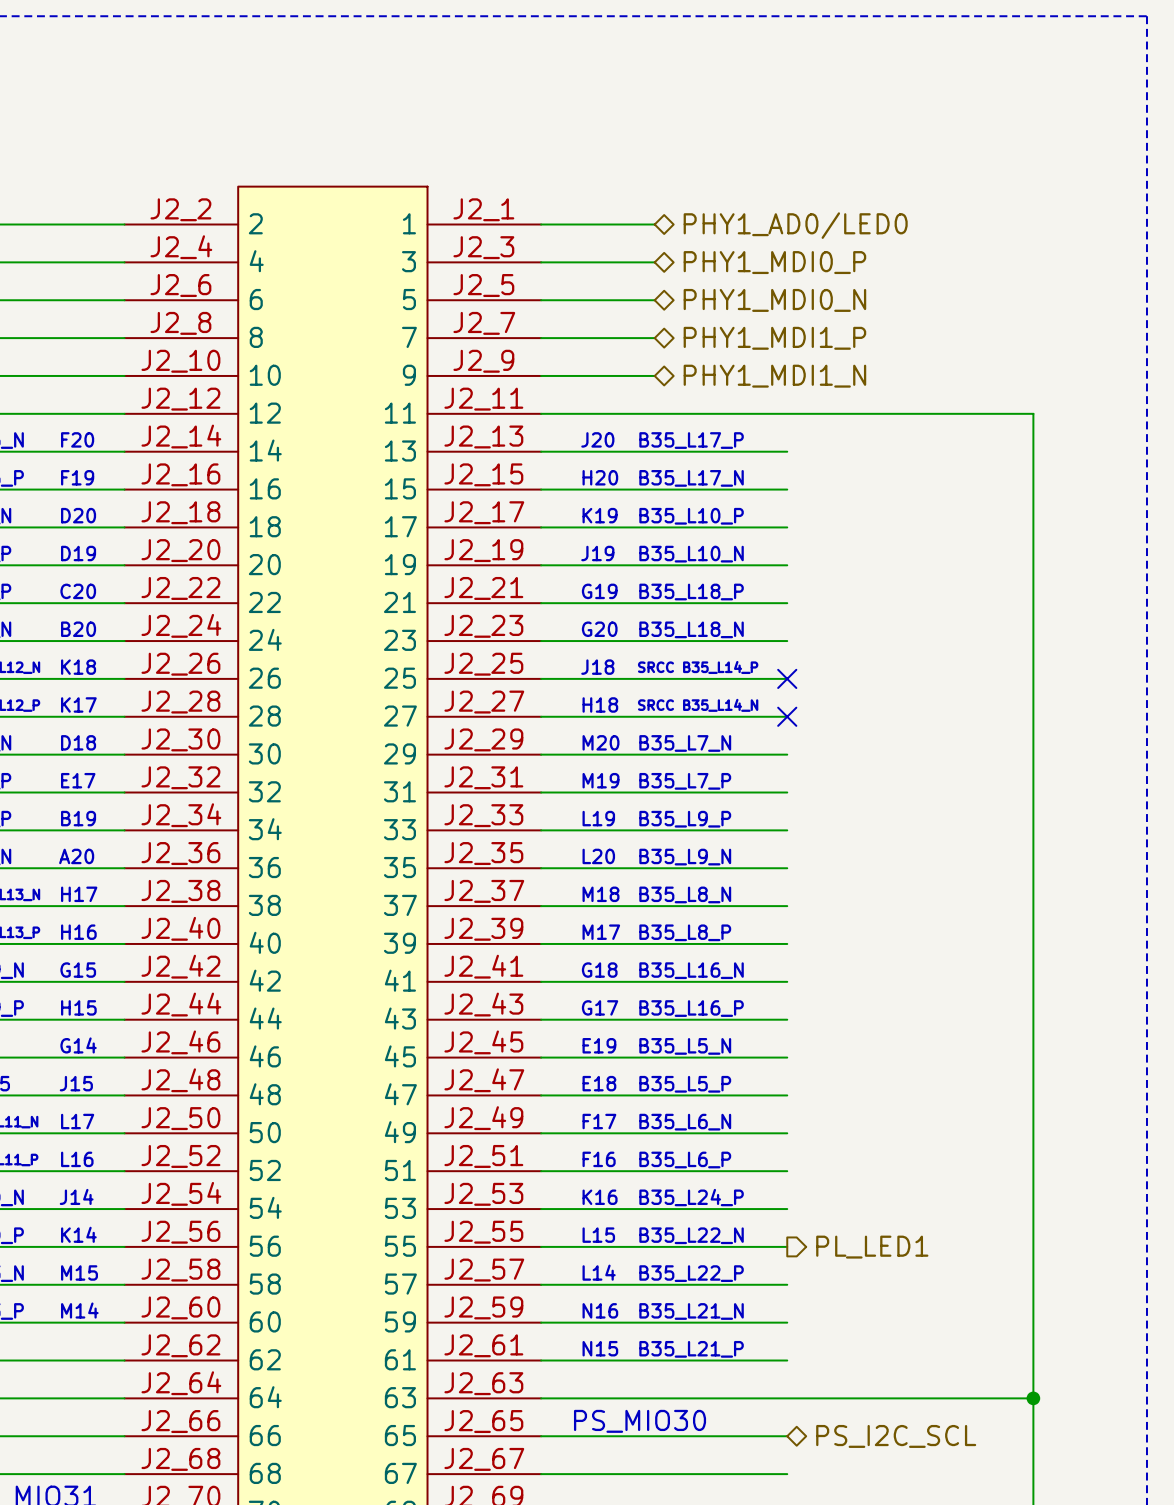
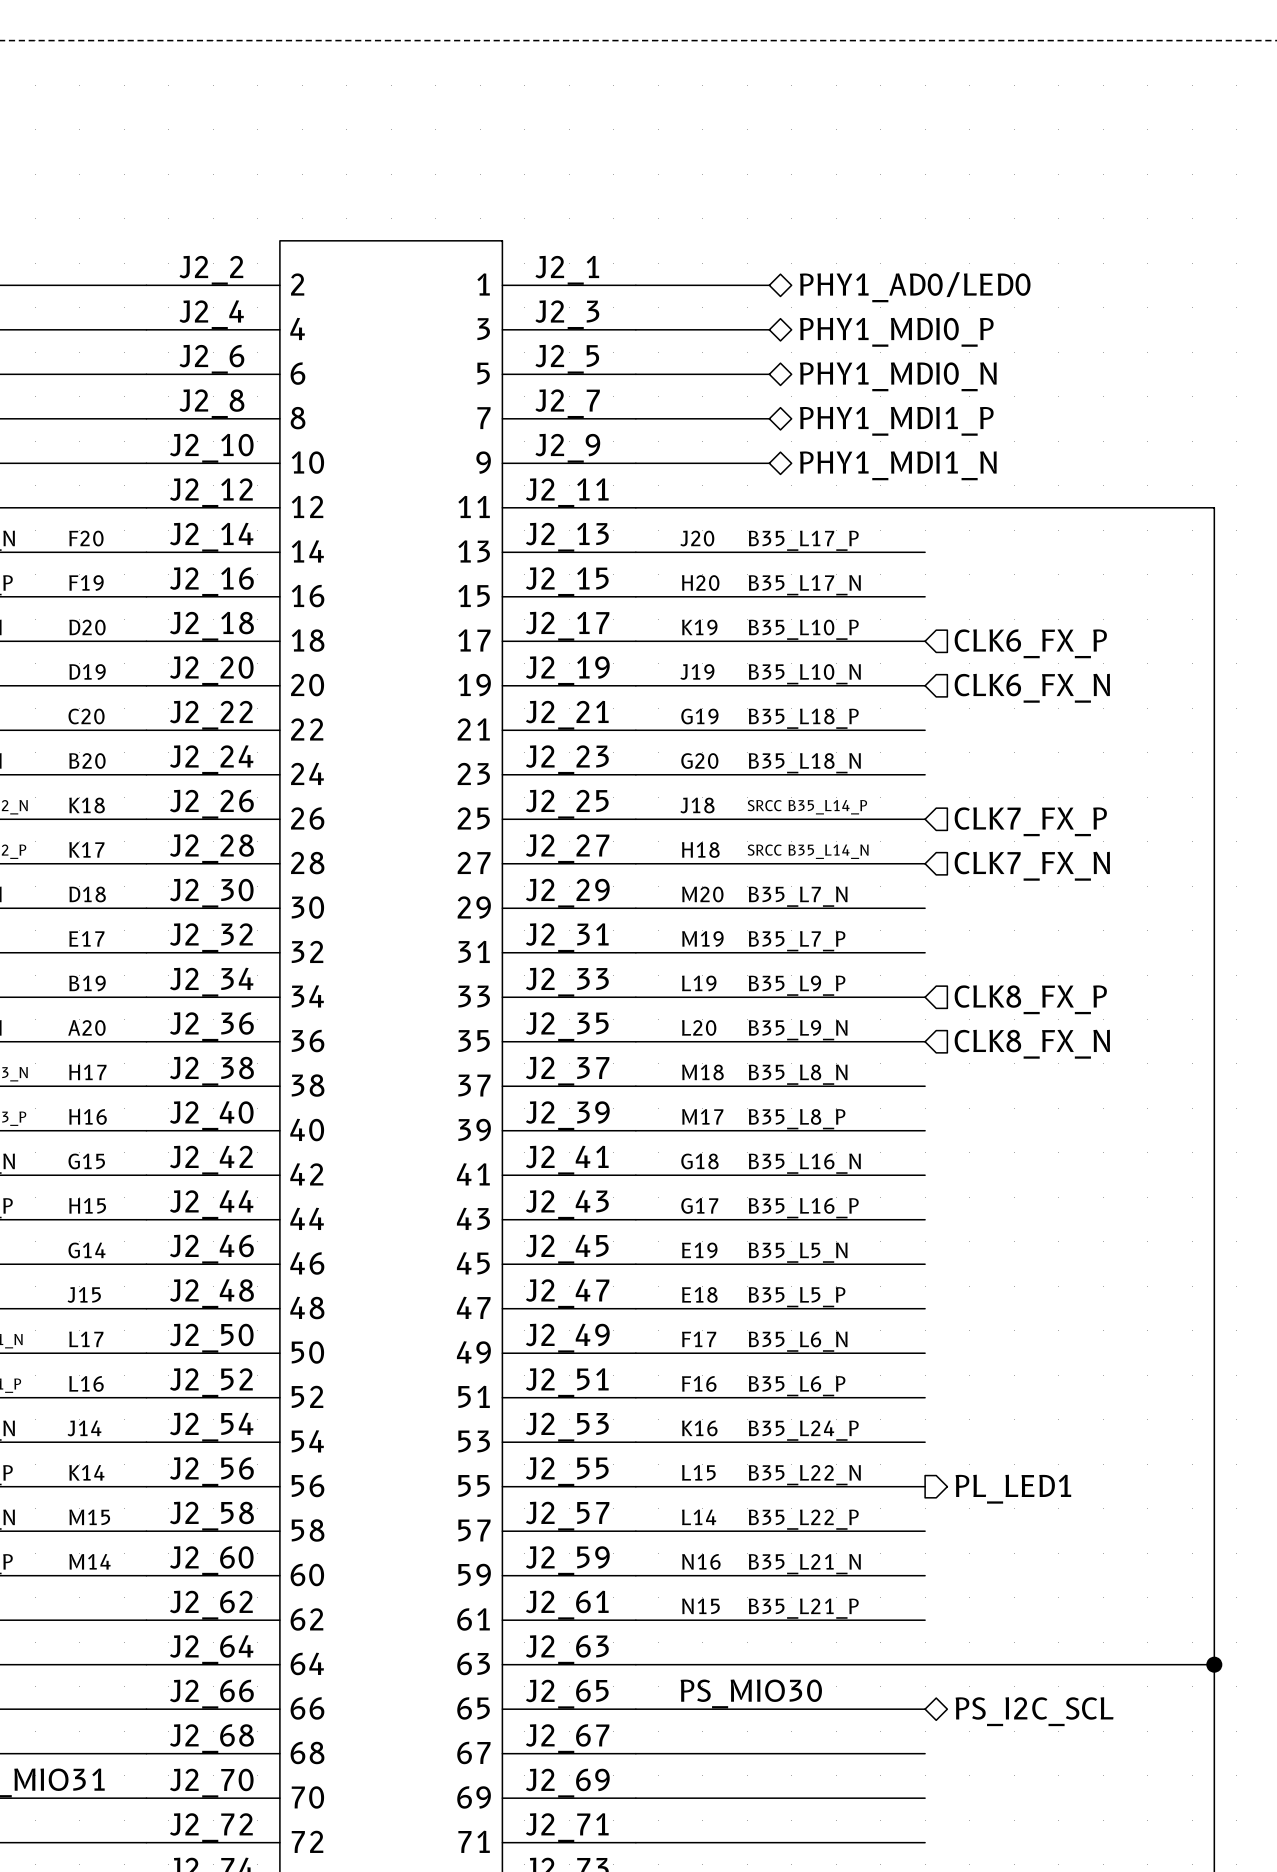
hierarchical label: none -> CLK6_FX_P (1030, 643)
hierarchical label: none -> CLK6_FX_N (1032, 688)
no-connect mark: (787, 678) -> none
hierarchical label: none -> CLK7_FX_P (1030, 821)
no-connect mark: (787, 716) -> none
hierarchical label: none -> CLK7_FX_N (1032, 866)
hierarchical label: none -> CLK8_FX_P (1030, 999)
hierarchical label: none -> CLK8_FX_N (1032, 1044)

